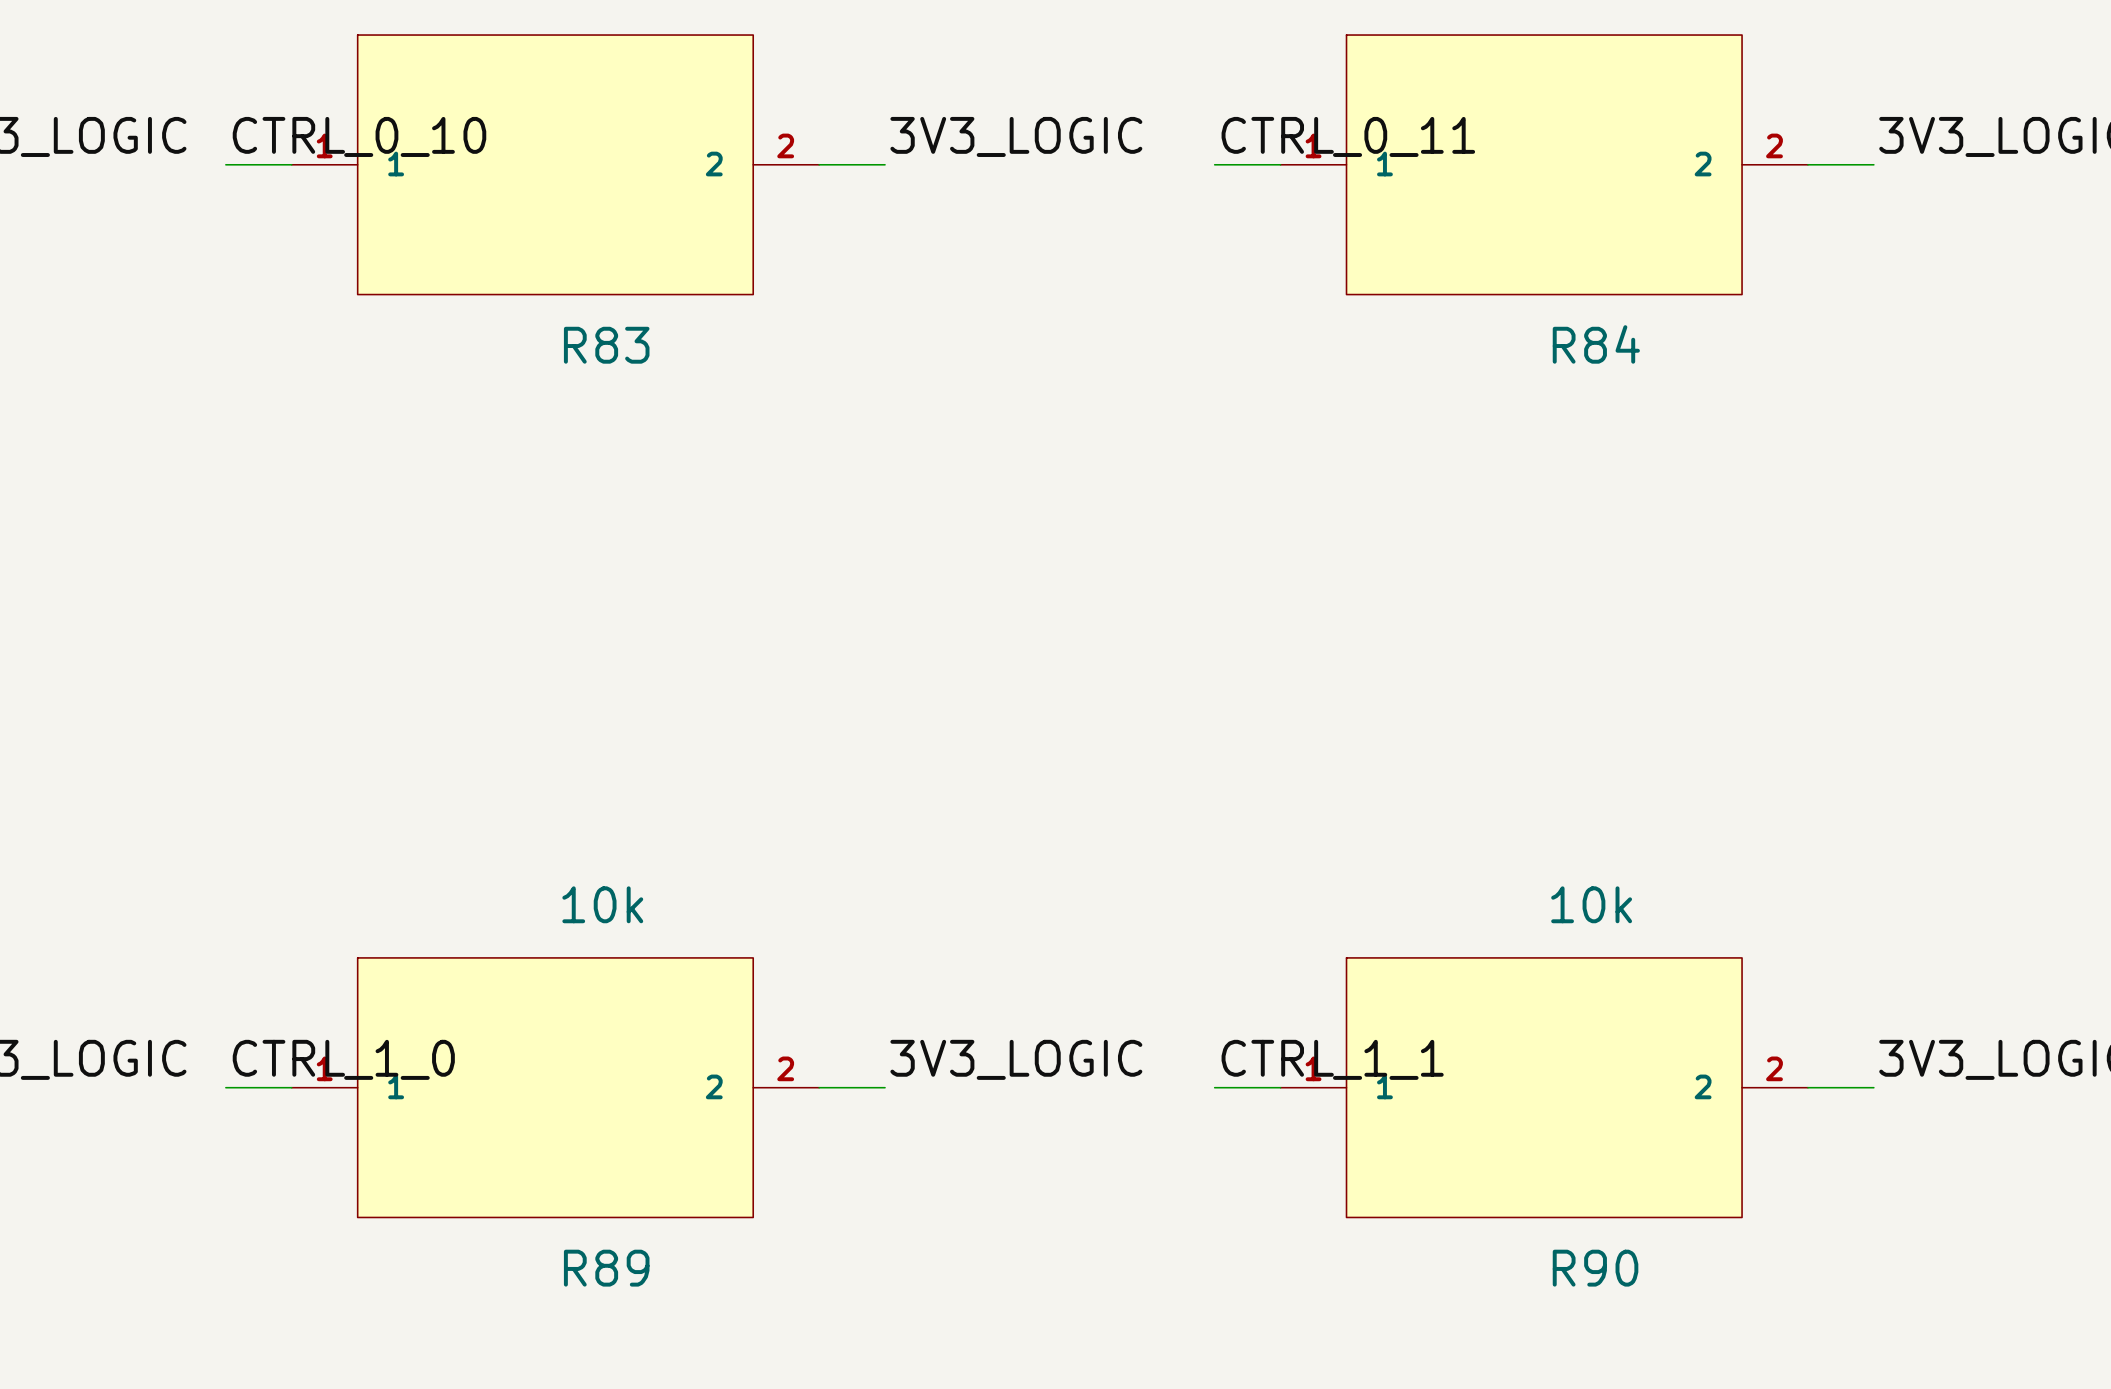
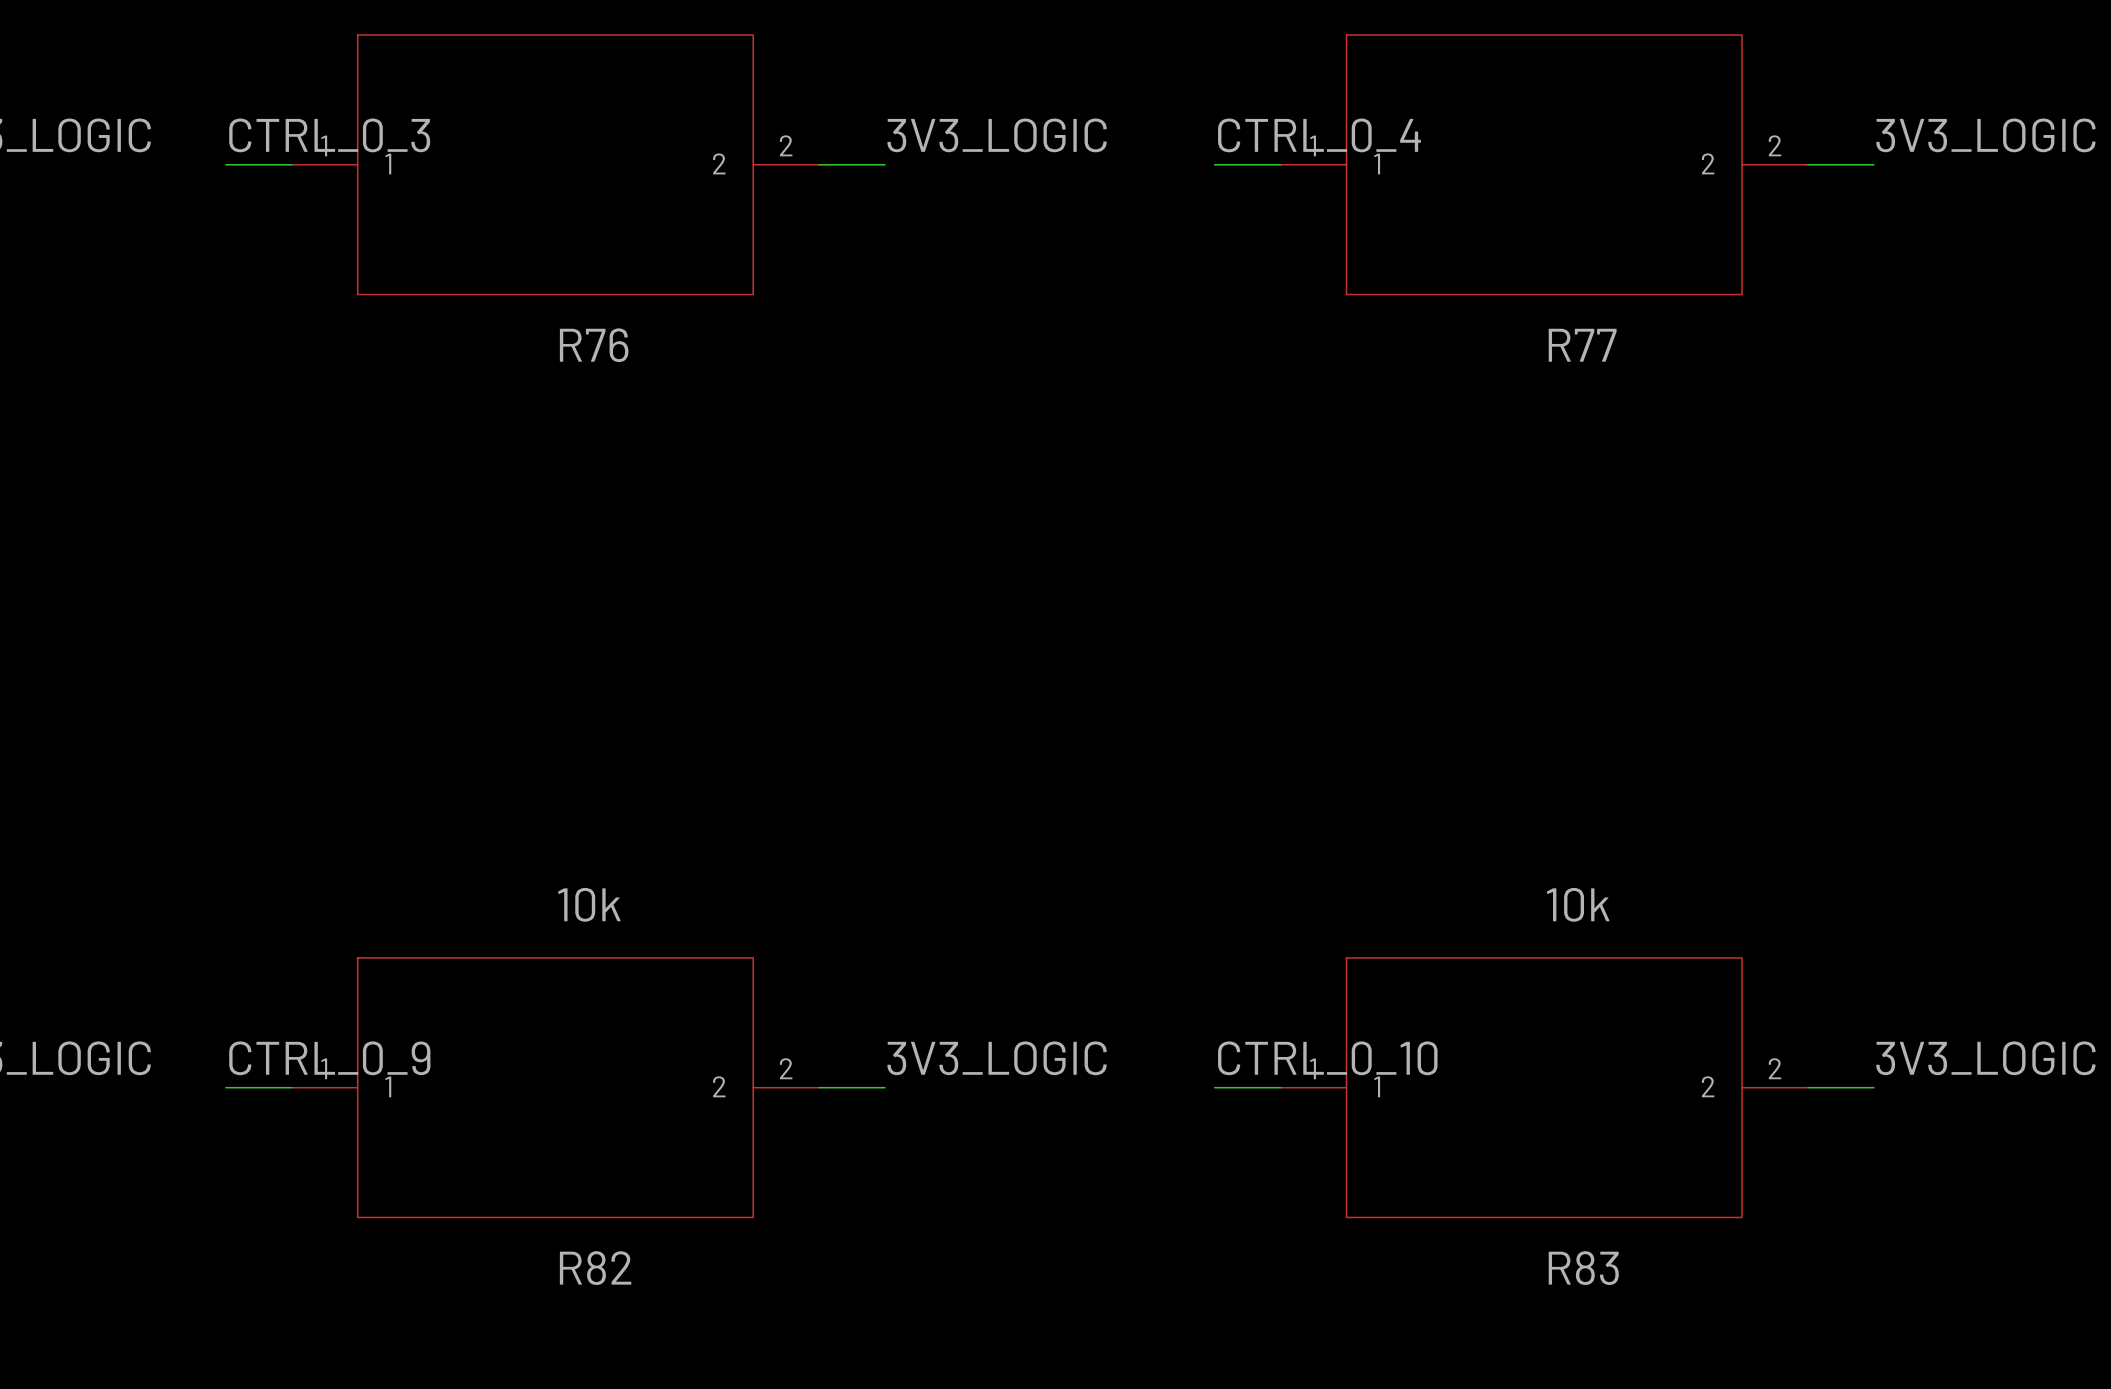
label: CTRL_0_10 (359, 136) -> CTRL_0_3 (329, 135)
label: CTRL_0_11 (1348, 136) -> CTRL_0_4 (1319, 135)
R84 name: R84 (1596, 344) -> R77 (1582, 345)
R83 name: R83 (606, 345) -> R76 (594, 345)
label: CTRL_1_0 (343, 1059) -> CTRL_0_9 (329, 1058)
label: CTRL_1_1 (1332, 1059) -> CTRL_0_10 (1327, 1058)
R89 name: R89 (606, 1268) -> R82 (595, 1268)
R90 name: R90 (1595, 1268) -> R83 (1583, 1268)

